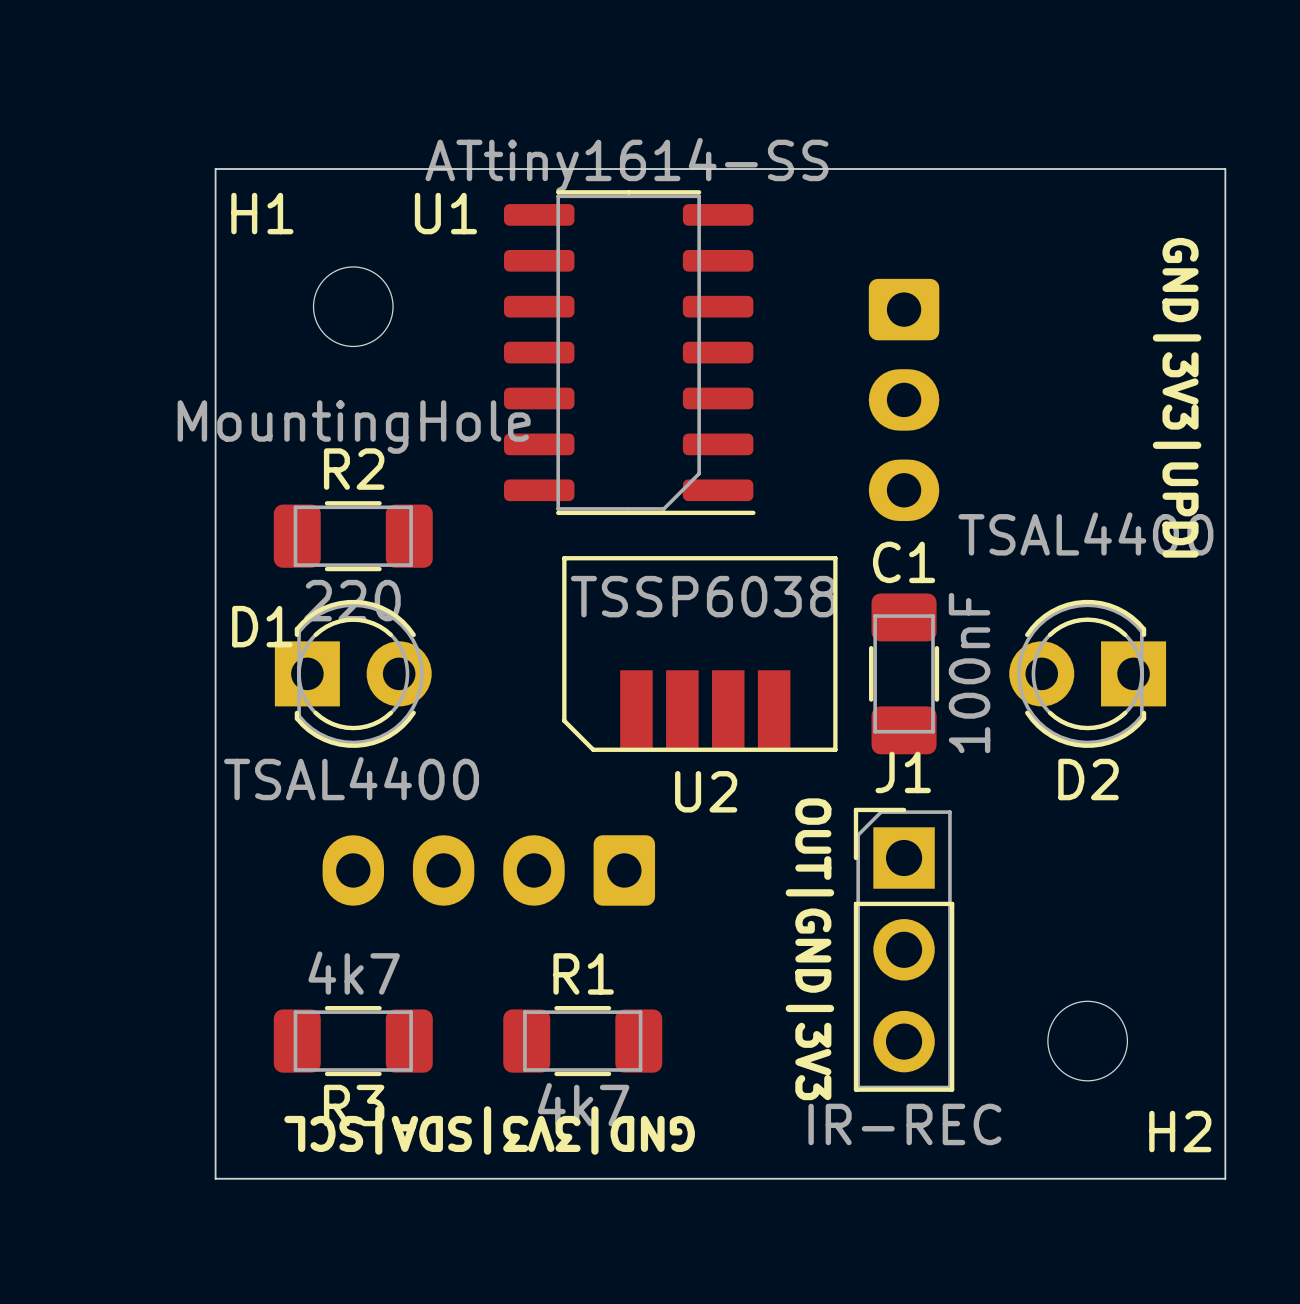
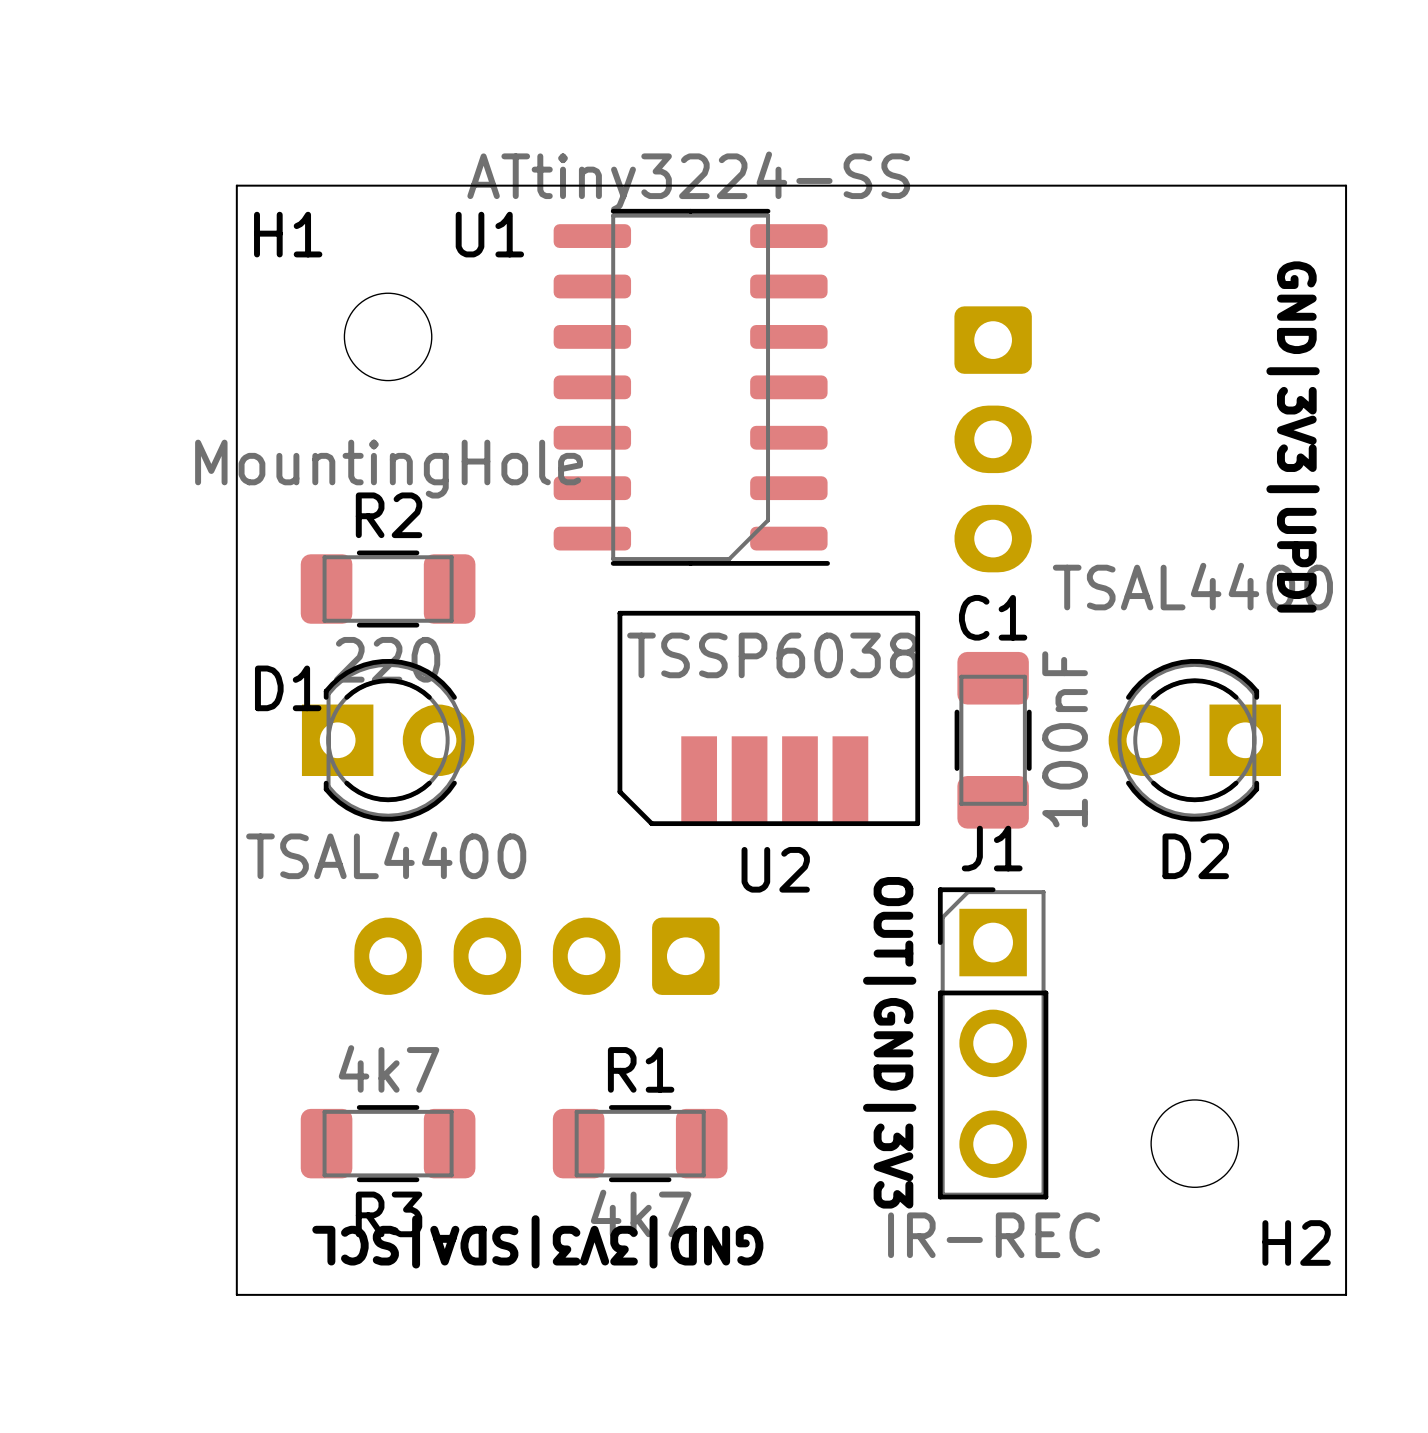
U1 value: ATtiny1614-SS (626, 165) -> ATtiny3224-SS (688, 181)

